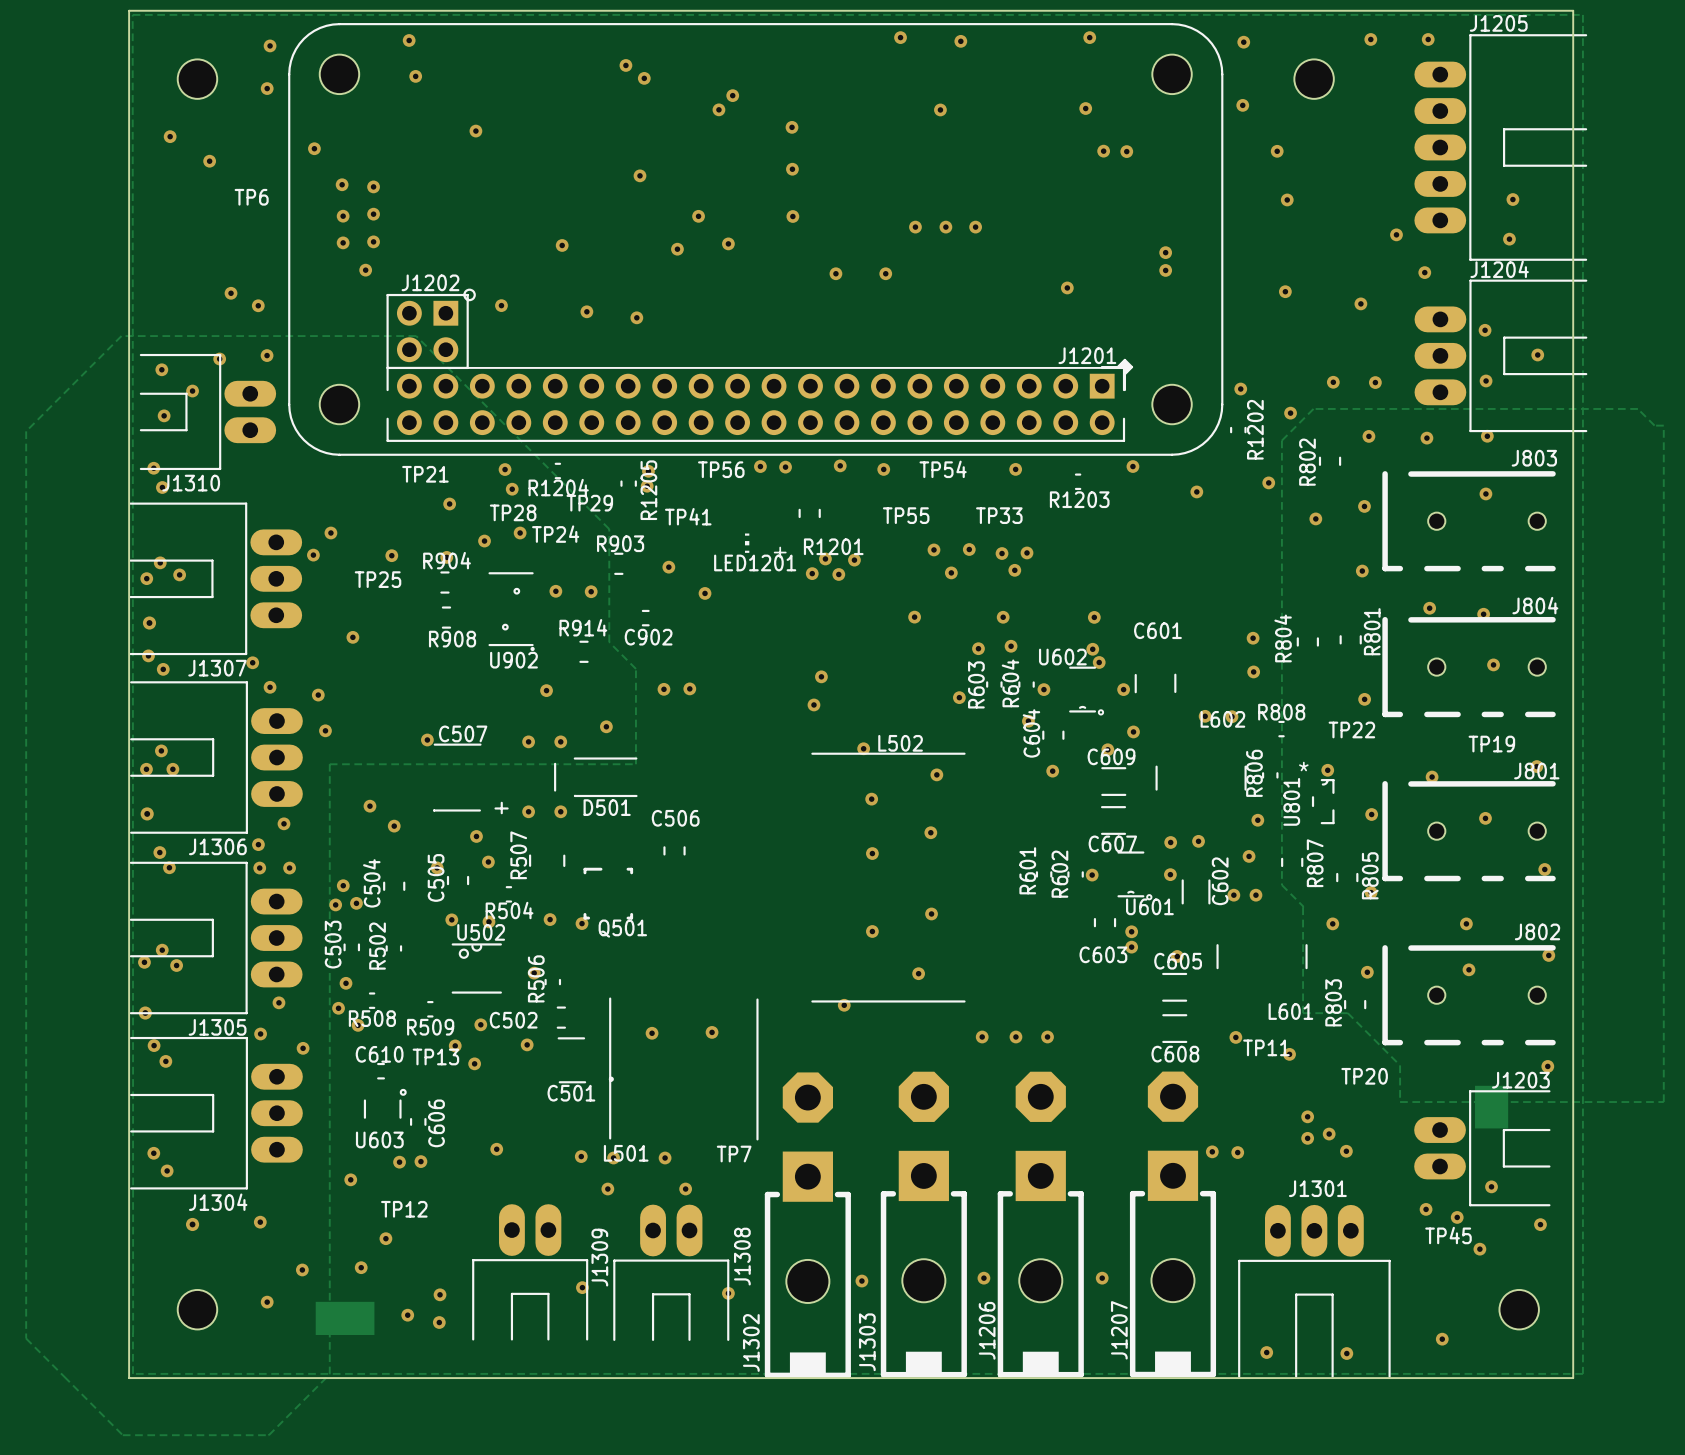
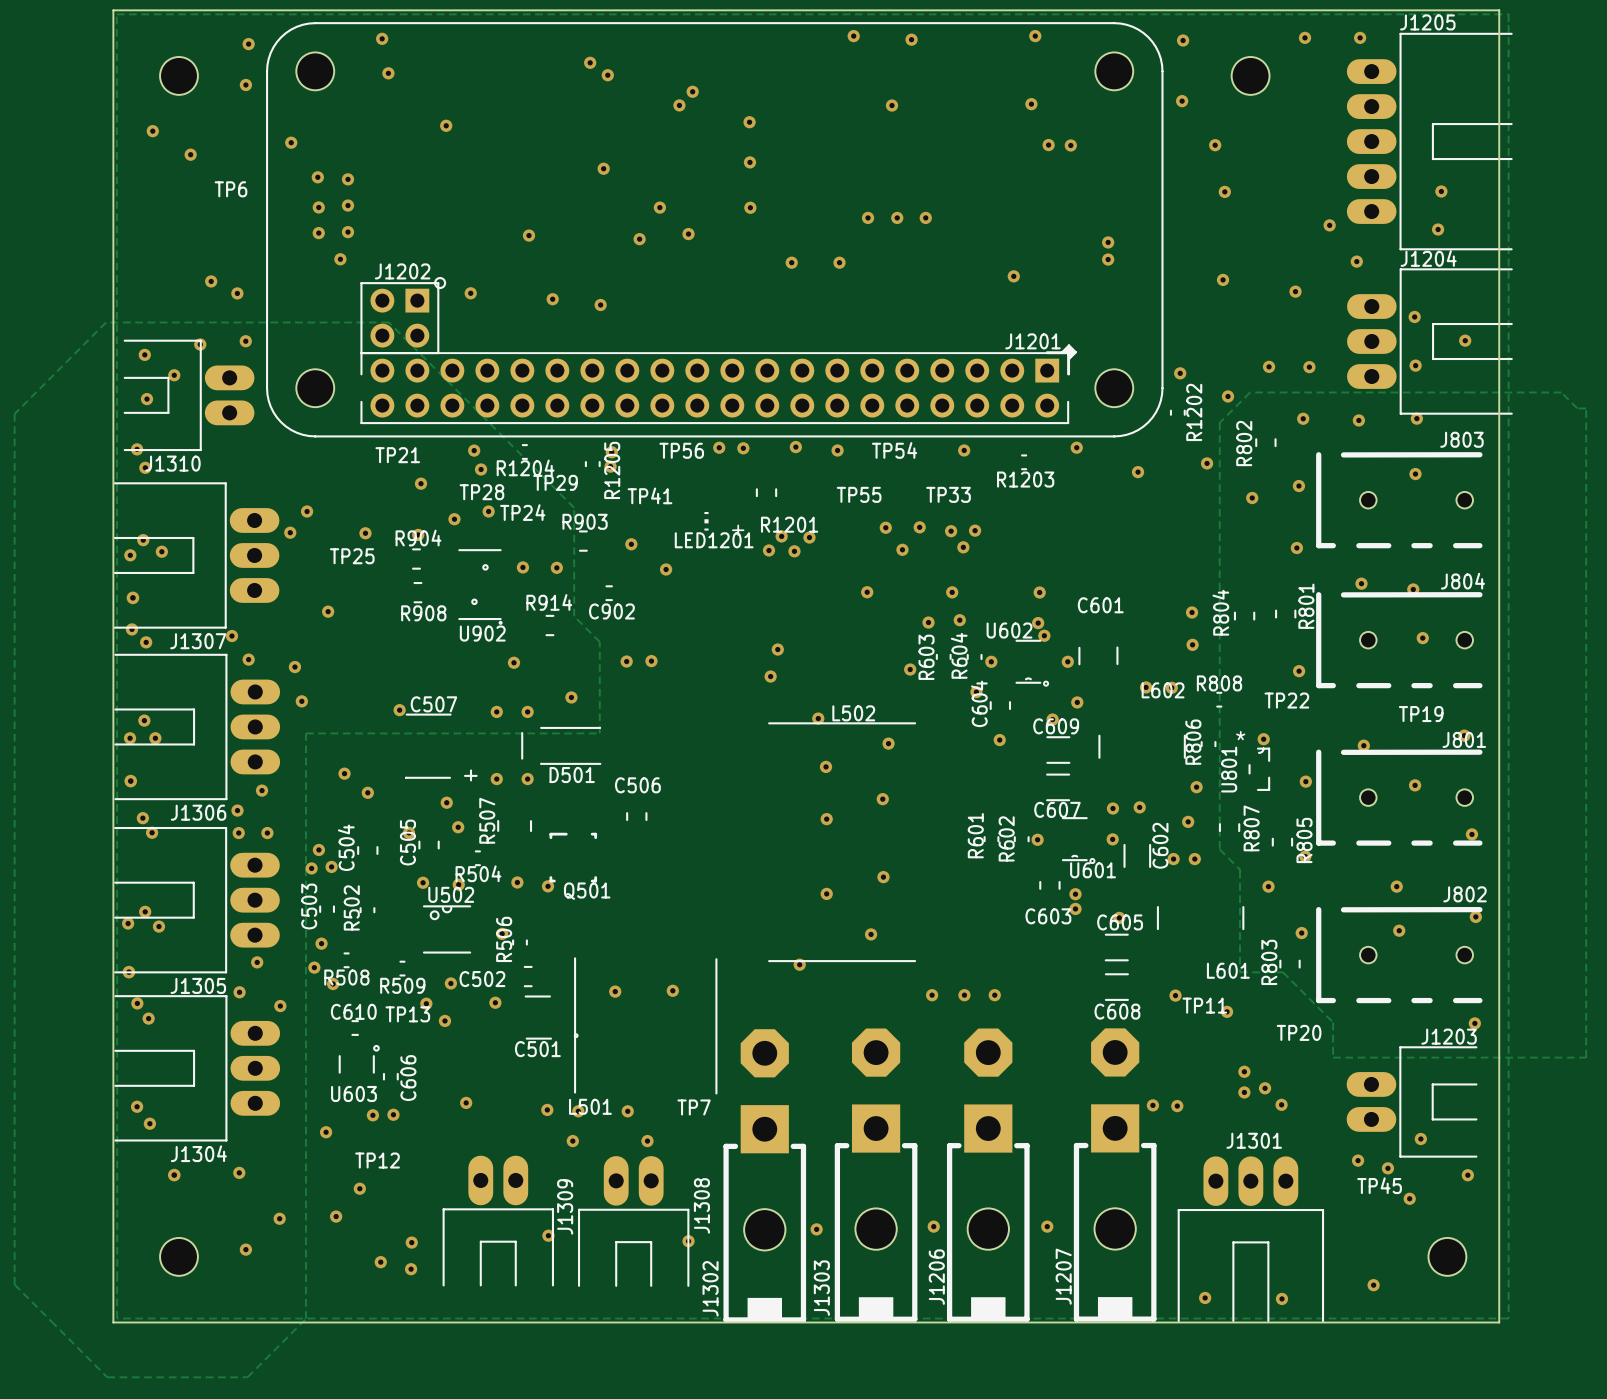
drawing: [1475, 1085, 1509, 1129] -> none
drawing: [315, 1301, 375, 1336] -> none

